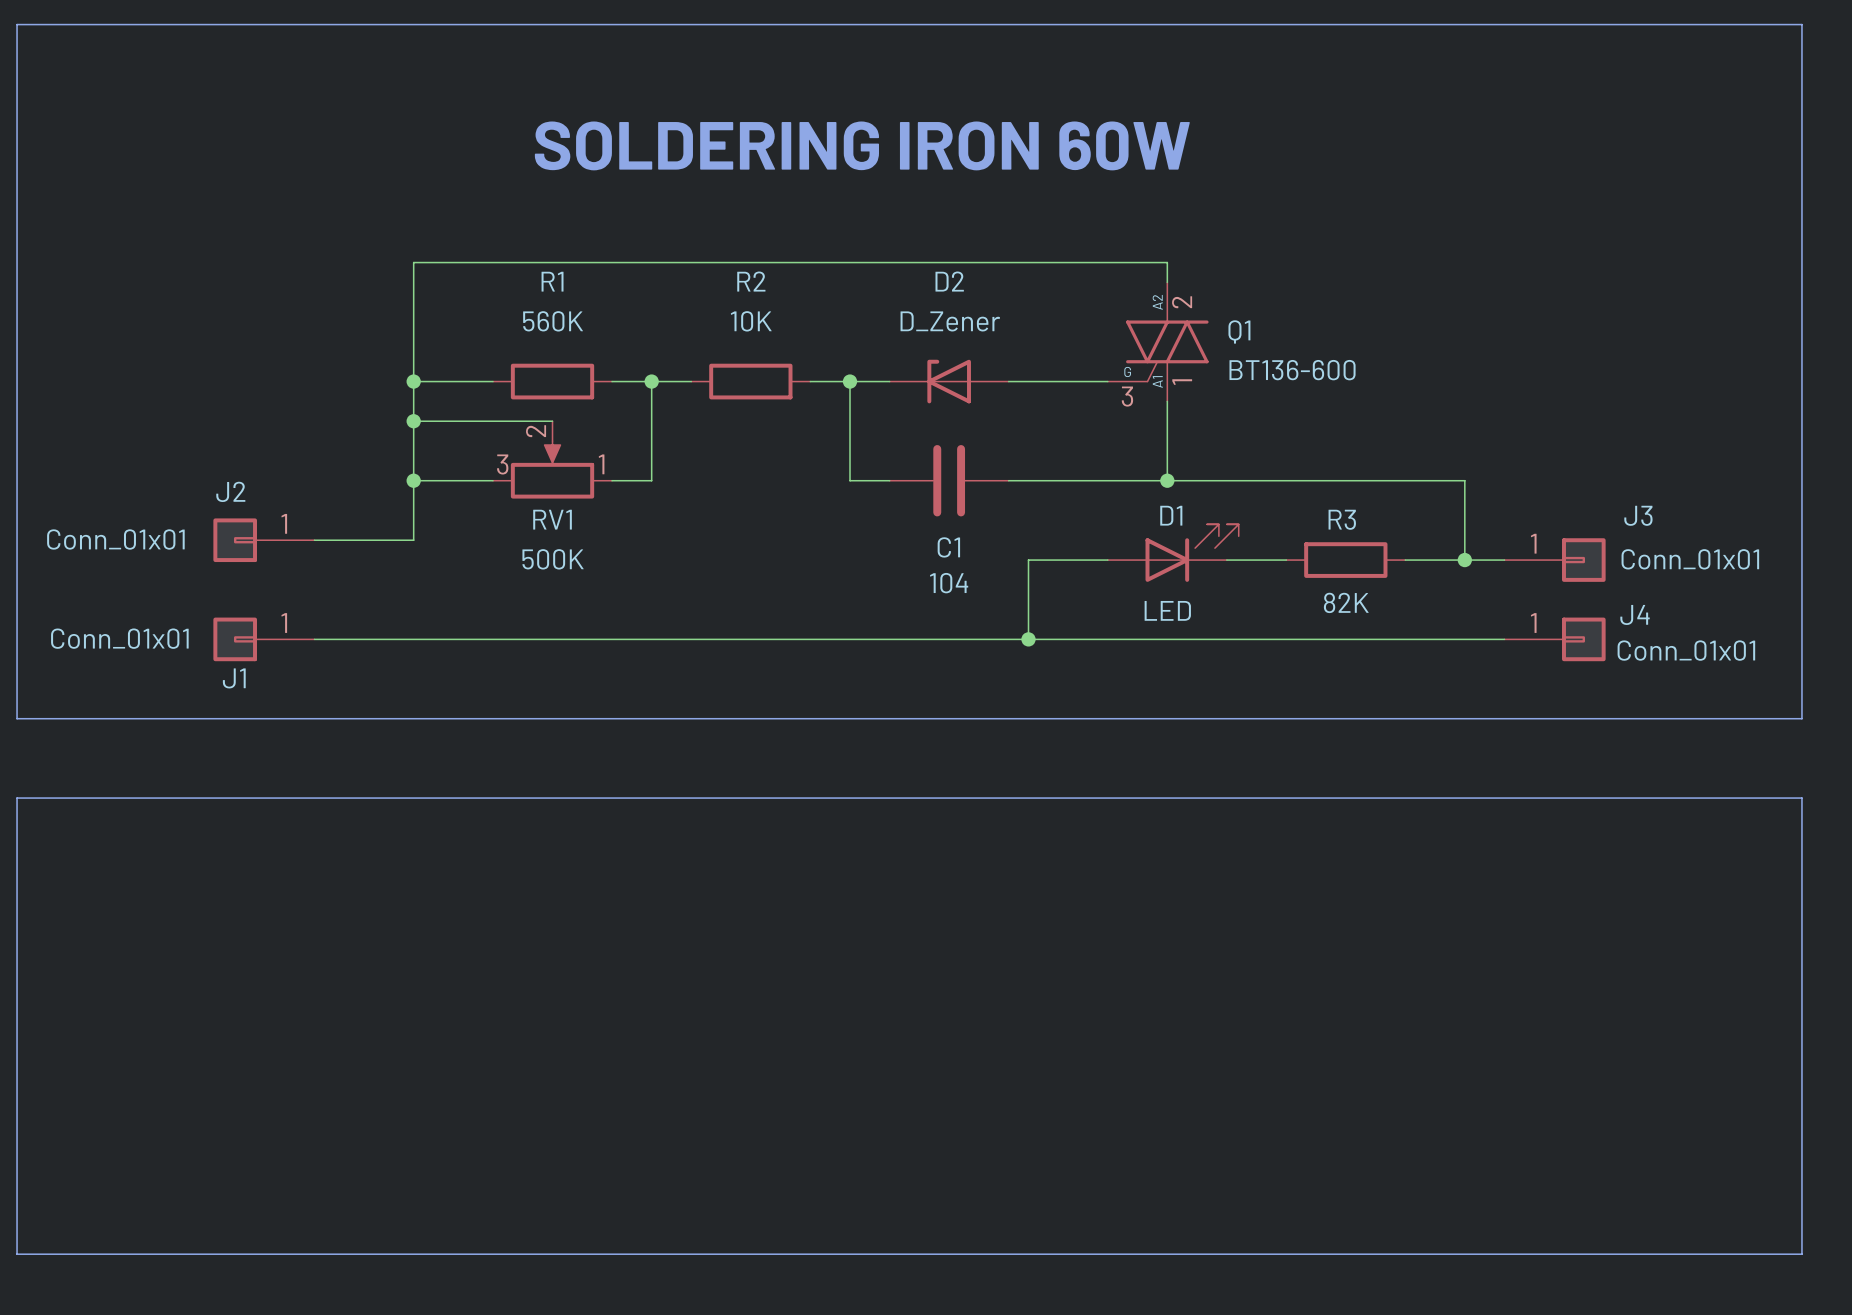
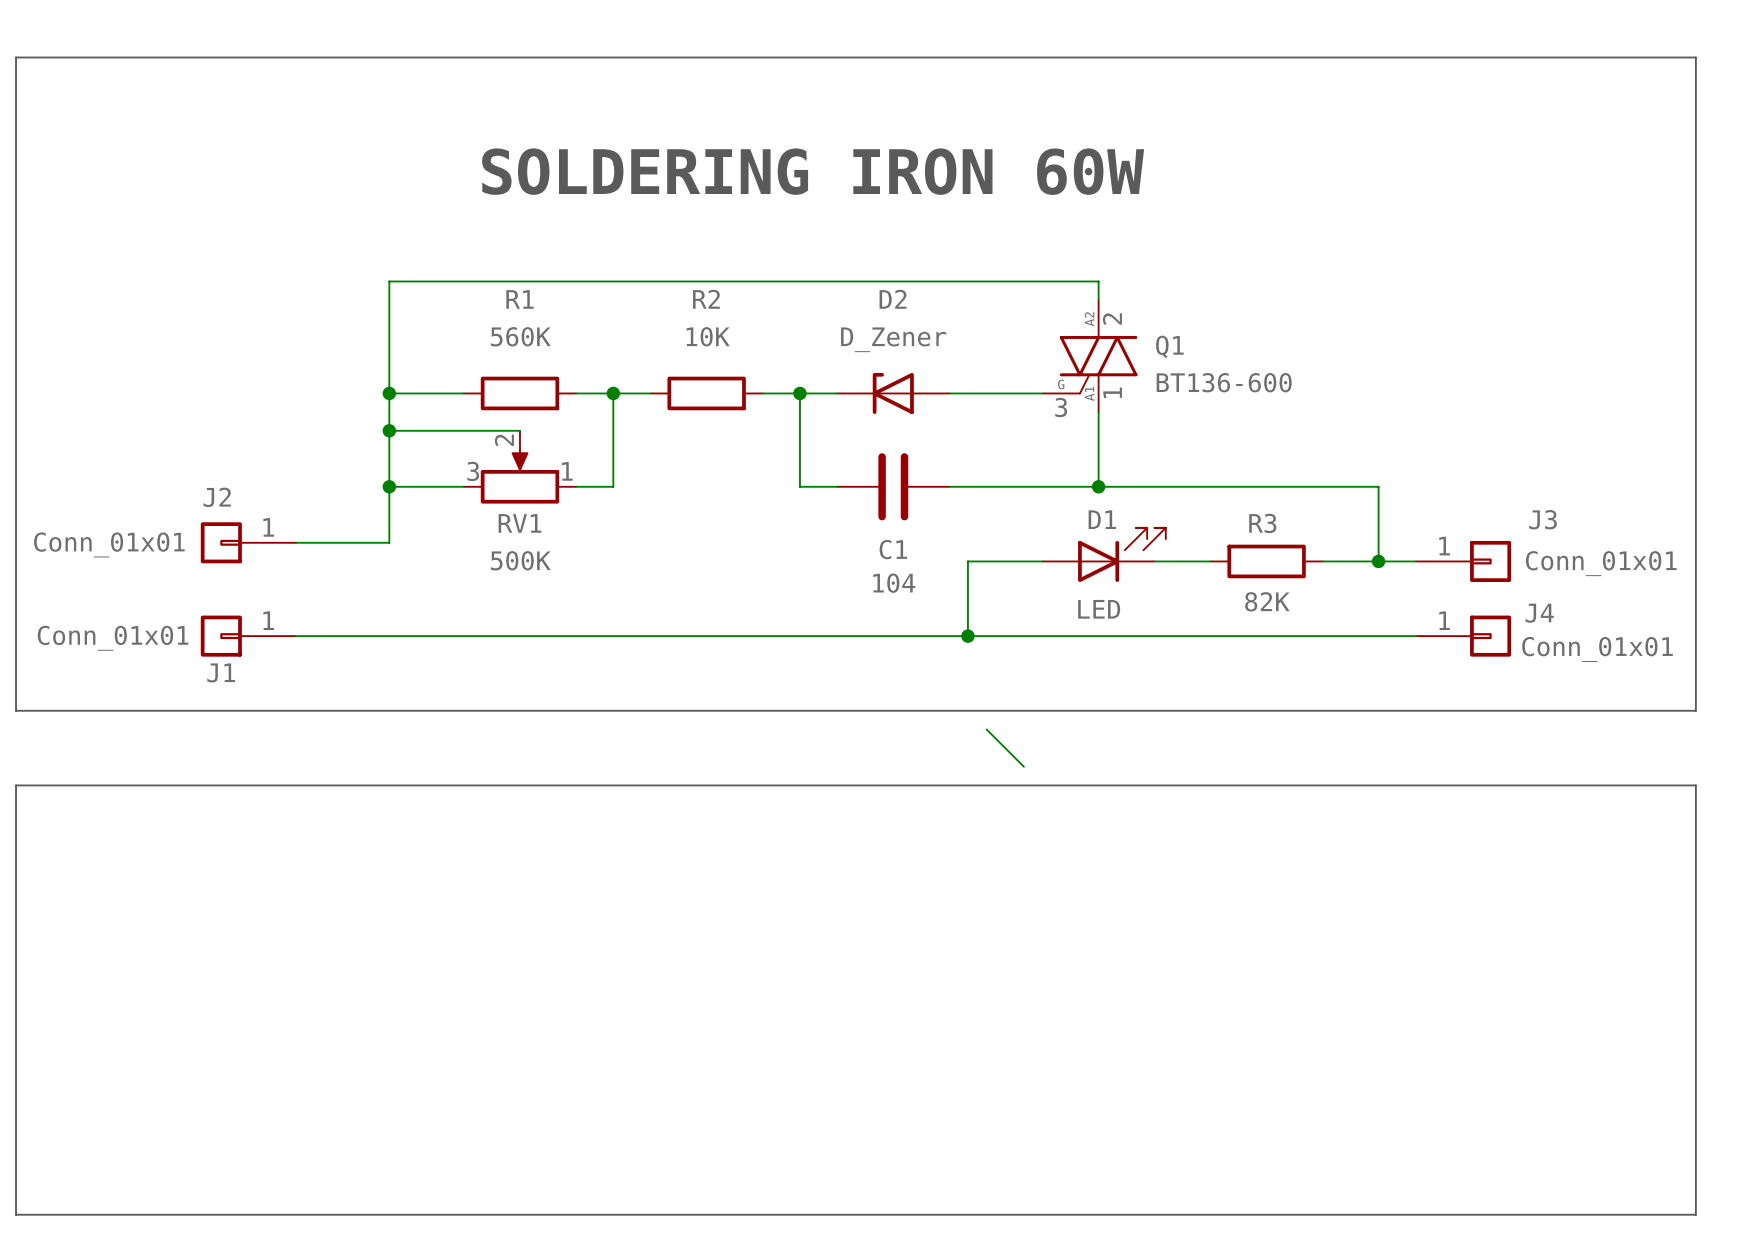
wire: none -> (986, 729) (1023, 766)

